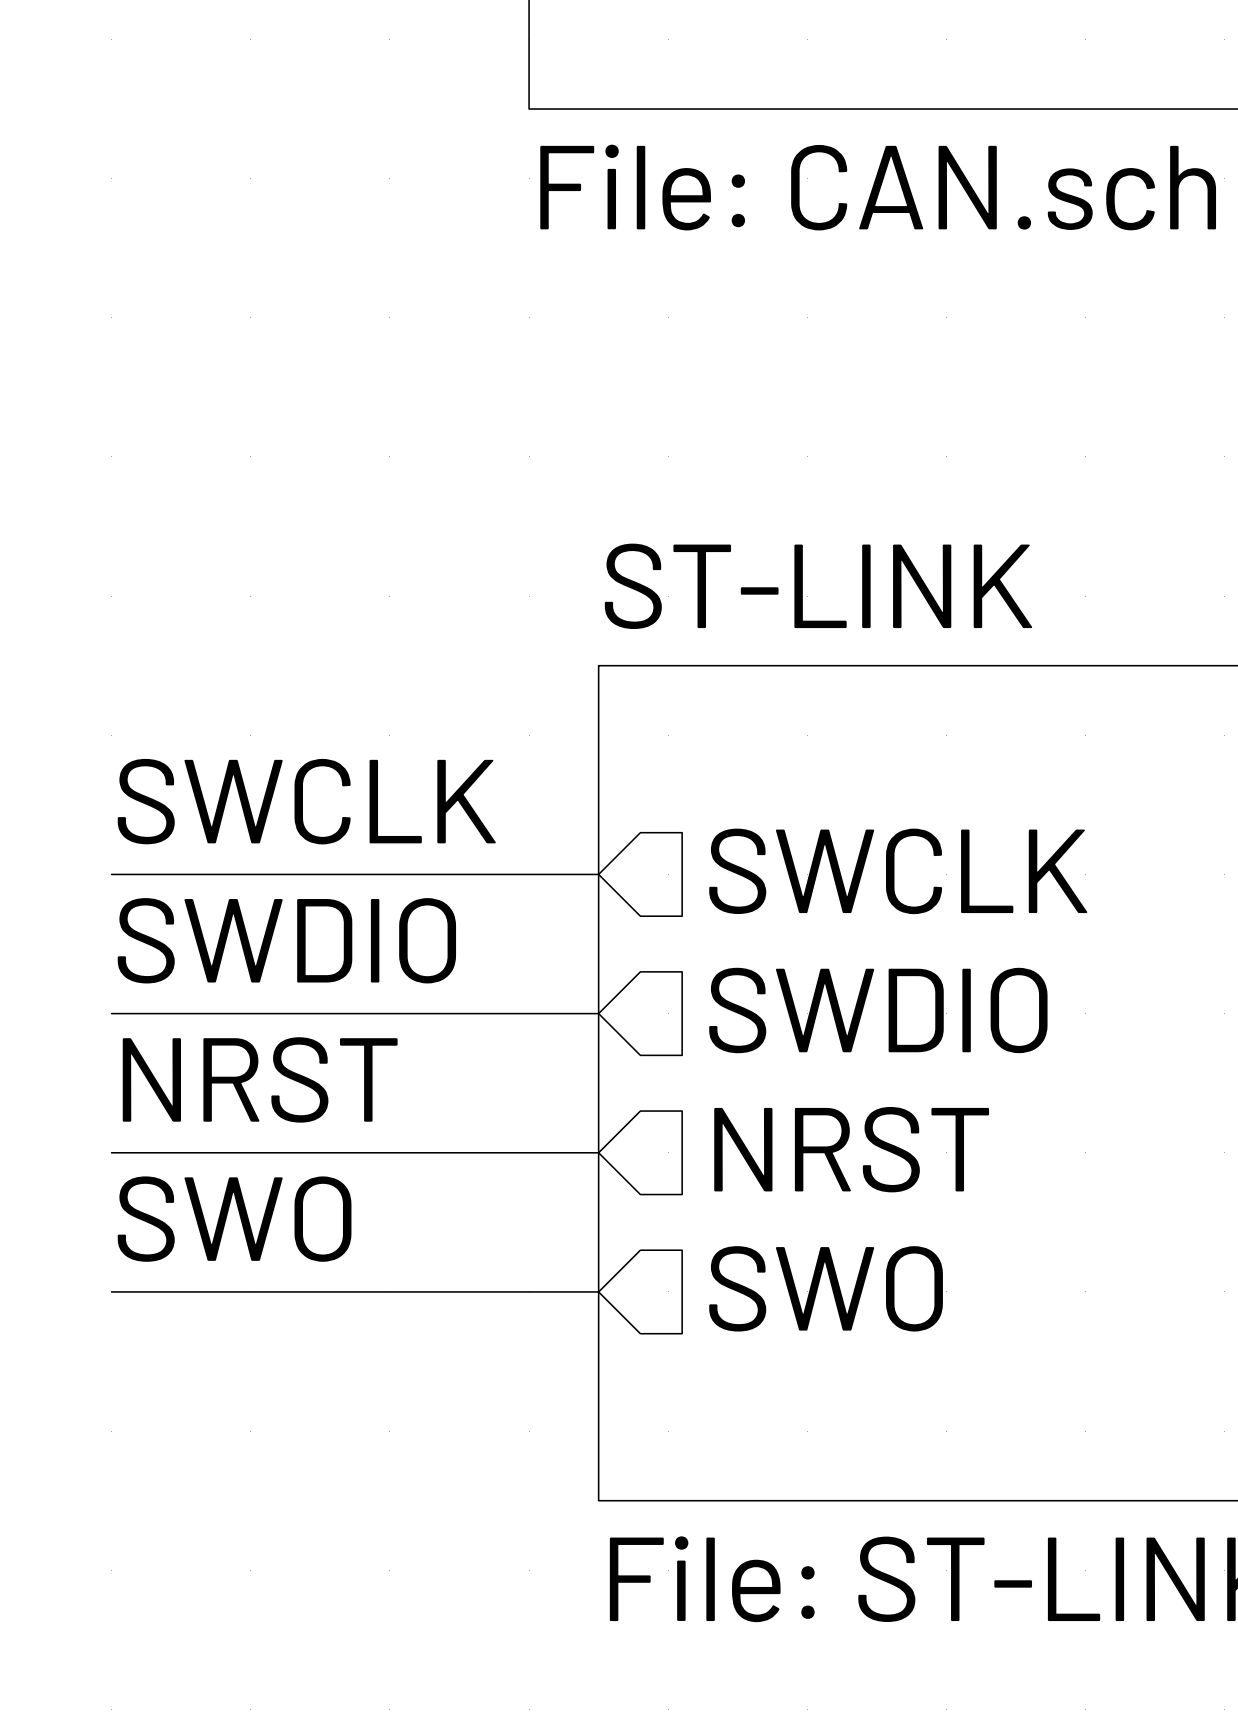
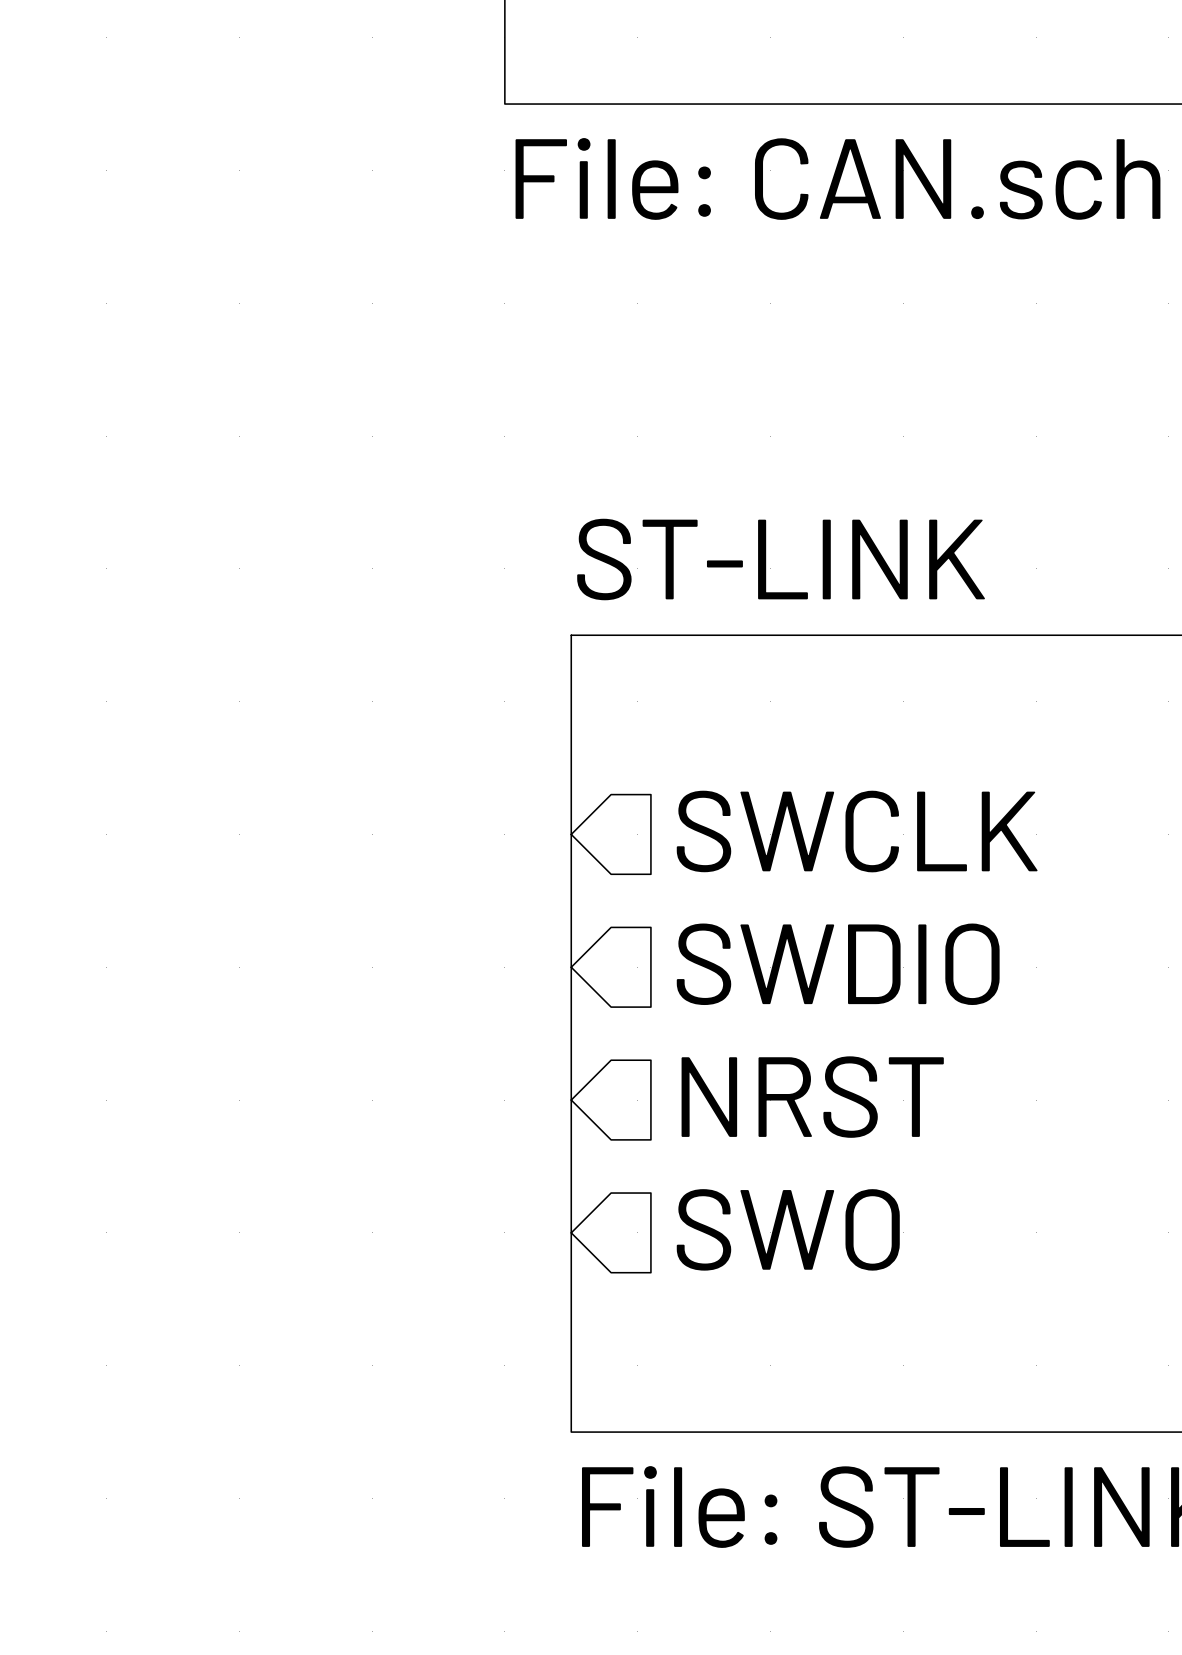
label: SWCLK (306, 801) -> none
wire: (111, 874) (598, 874) -> none
label: SWDIO (286, 940) -> none
wire: (111, 1013) (598, 1013) -> none
label: NRST (260, 1079) -> none
wire: (111, 1152) (598, 1152) -> none
label: SWO (234, 1219) -> none
wire: (111, 1291) (598, 1291) -> none

